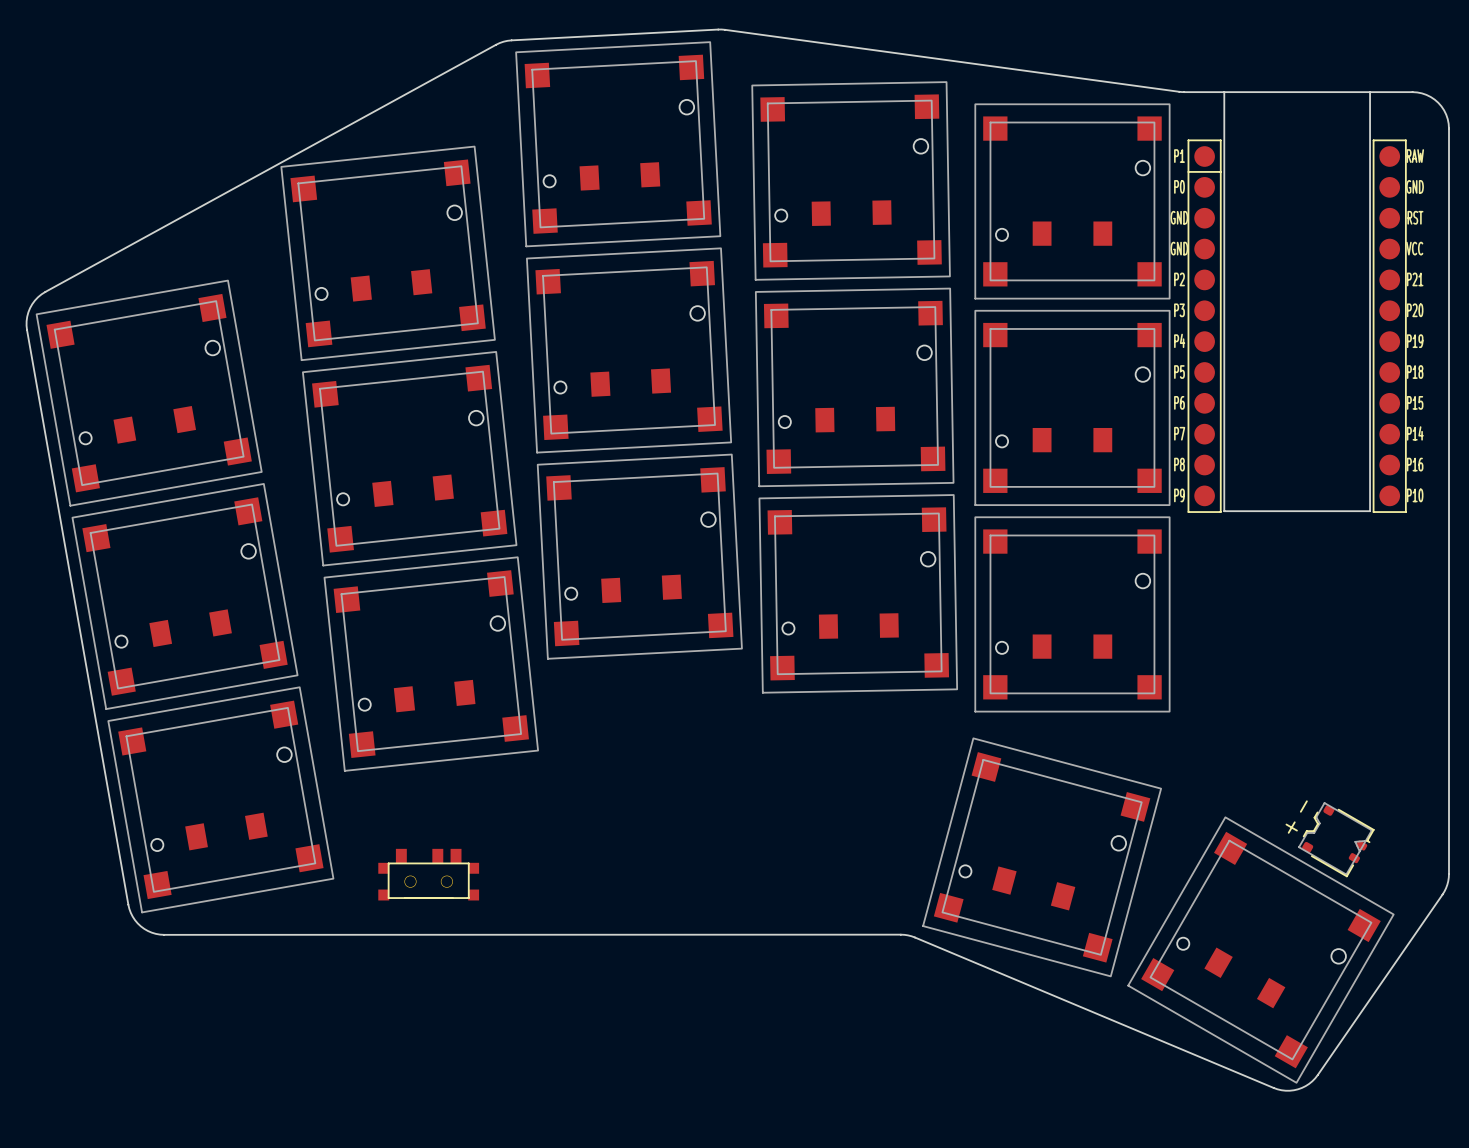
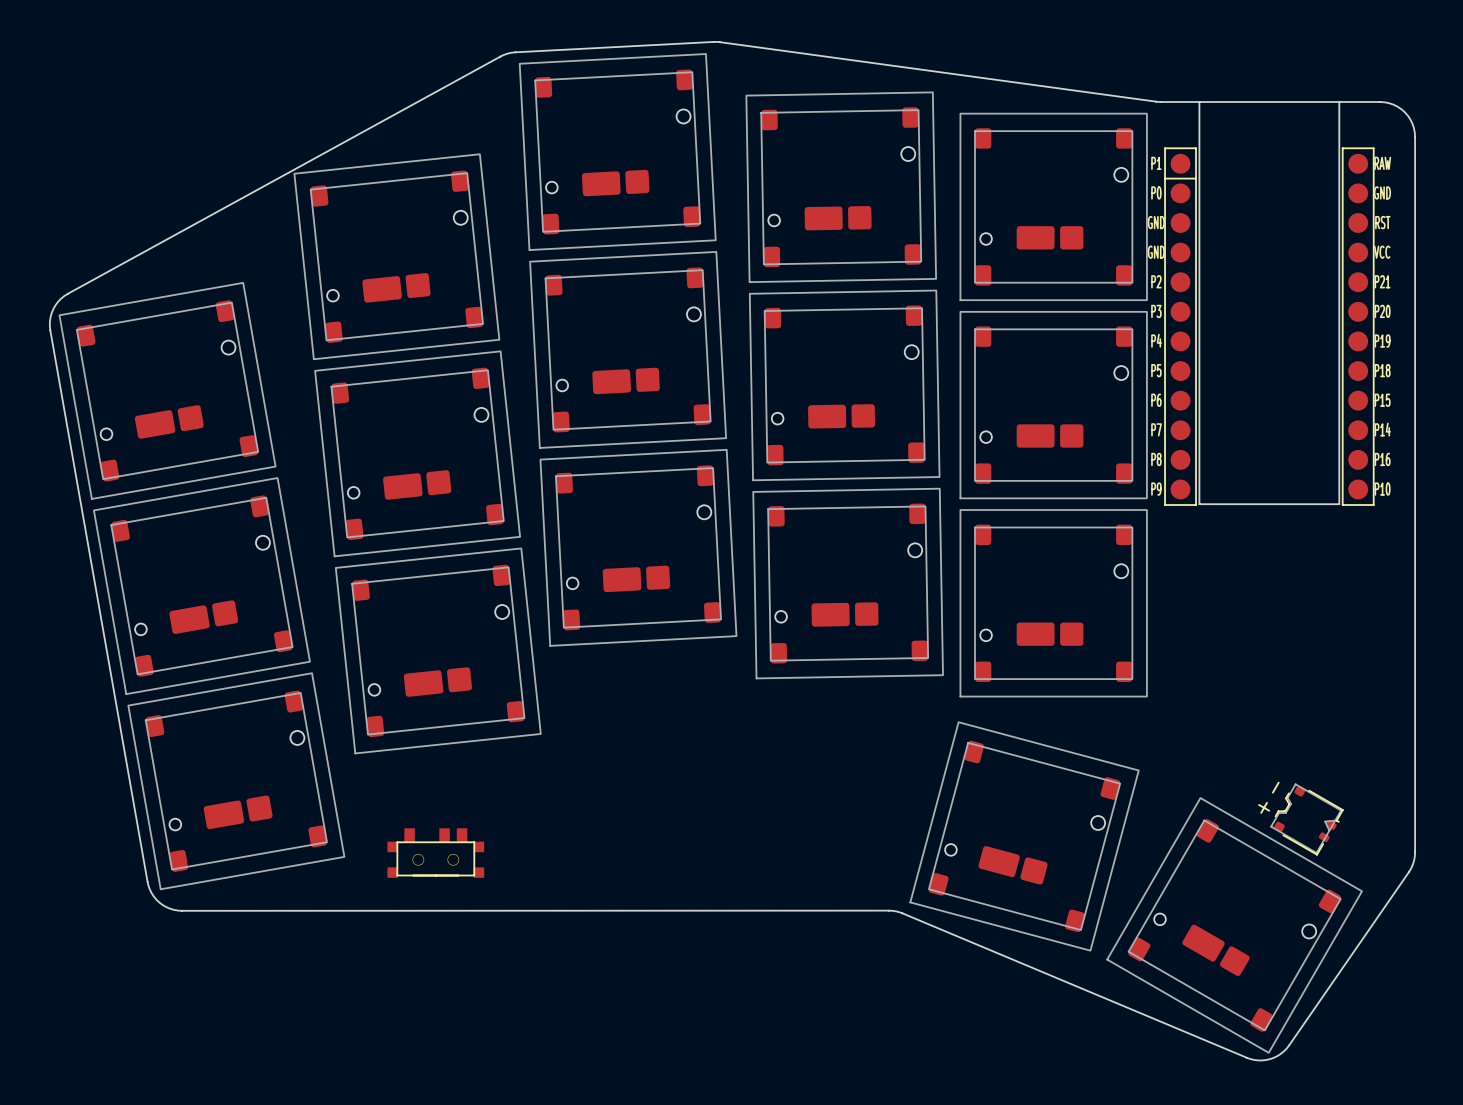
part footprint: [515, 41, 721, 247] -> [519, 53, 717, 251]
part footprint: [751, 81, 951, 281] -> [745, 91, 937, 283]
part footprint: [974, 103, 1171, 300] -> [959, 113, 1148, 301]
part footprint: [280, 145, 496, 361] -> [293, 153, 500, 360]
part footprint: [526, 247, 732, 454] -> [529, 251, 727, 449]
part footprint: [35, 279, 263, 507] -> [58, 282, 277, 500]
part footprint: [755, 287, 955, 487] -> [749, 289, 941, 481]
part footprint: [974, 310, 1171, 506] -> [959, 311, 1148, 499]
part footprint: [302, 351, 518, 567] -> [314, 350, 521, 557]
part footprint: [537, 453, 743, 660] -> [539, 449, 738, 647]
part footprint: [71, 483, 299, 710] -> [93, 477, 311, 695]
part footprint: [758, 494, 958, 694] -> [752, 488, 944, 680]
part footprint: [974, 516, 1171, 713] -> [959, 509, 1148, 698]
part footprint: [323, 556, 539, 772] -> [335, 547, 542, 755]
part footprint: [107, 686, 335, 914] -> [127, 672, 345, 890]
part footprint: [922, 737, 1162, 977] -> [909, 721, 1140, 952]
part footprint: [1127, 816, 1395, 1084] -> [1106, 797, 1363, 1054]

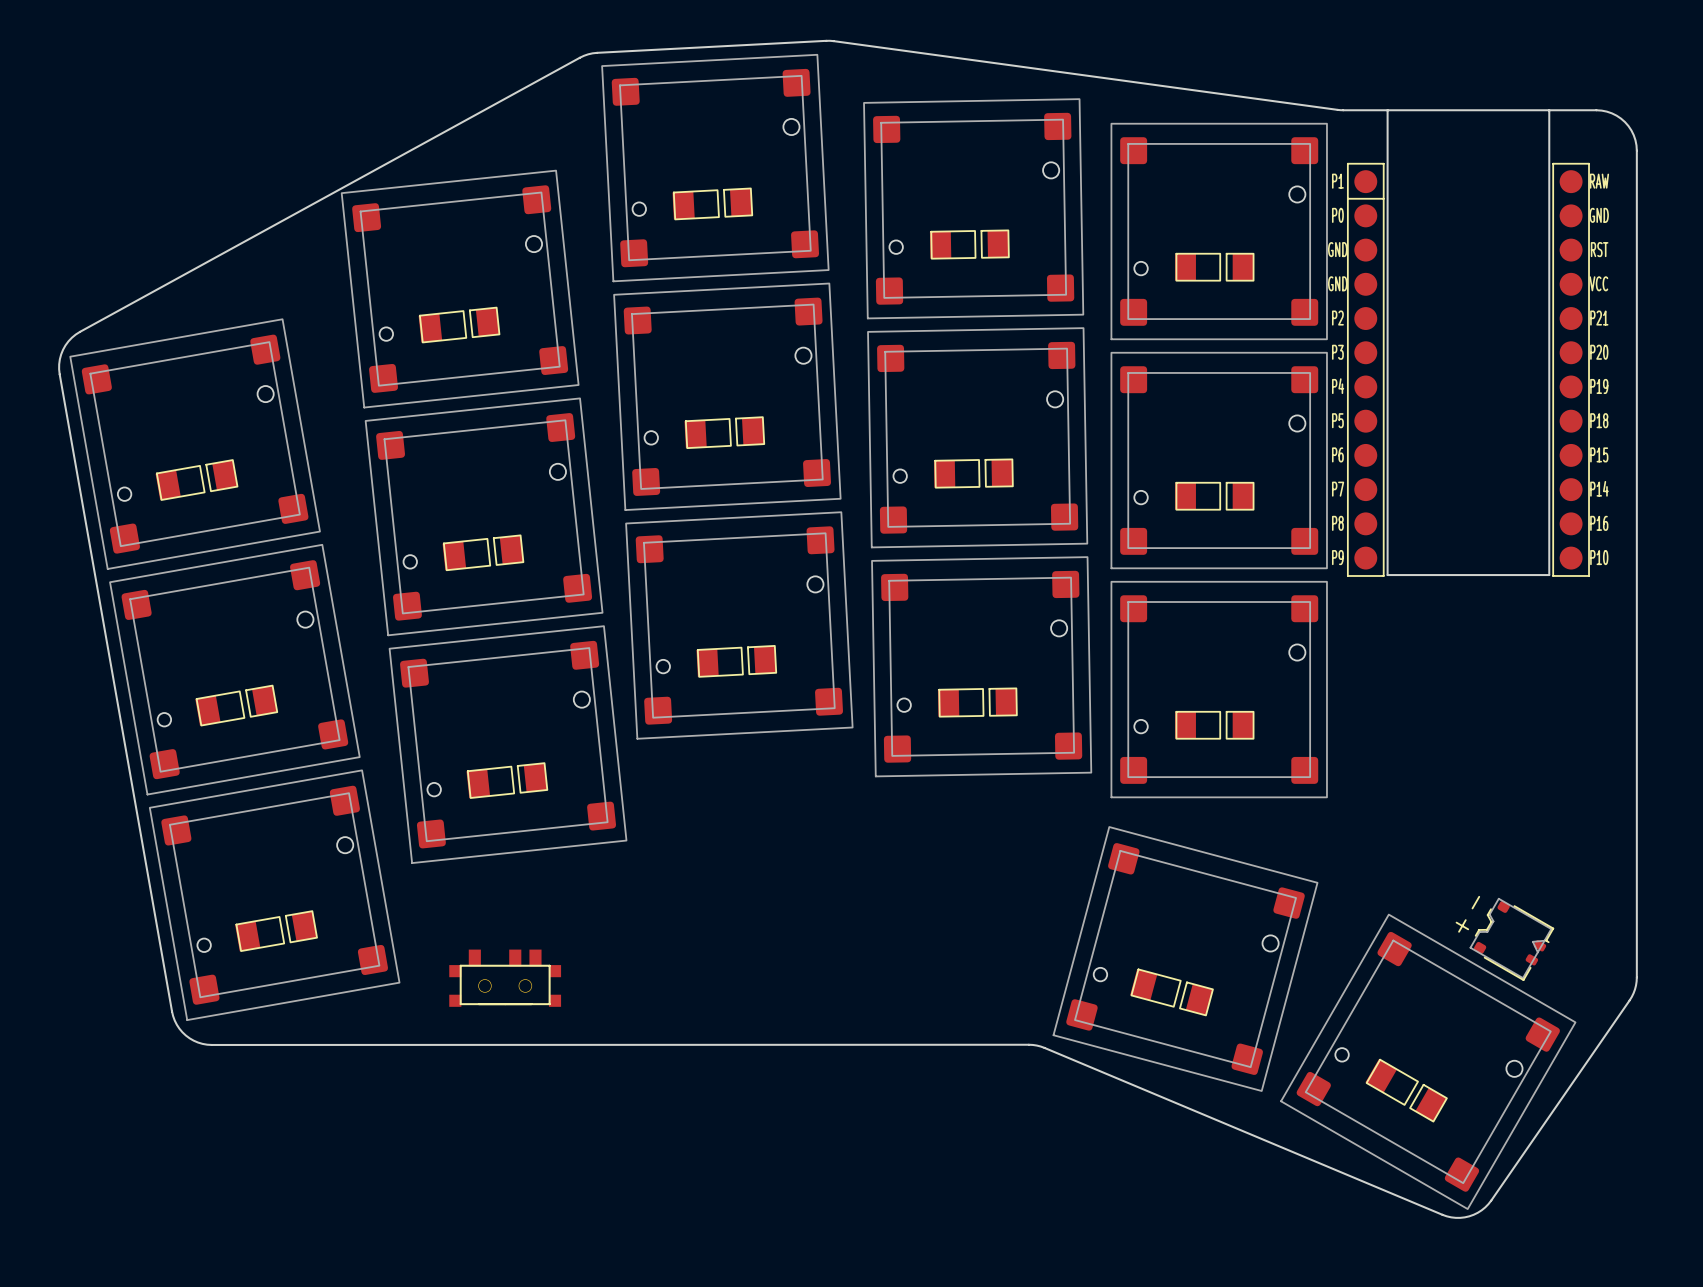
part footprint: [519, 53, 717, 251] -> [601, 54, 830, 283]
part footprint: [745, 91, 937, 283] -> [863, 98, 1084, 320]
part footprint: [959, 113, 1148, 301] -> [1110, 123, 1328, 340]
part footprint: [293, 153, 500, 360] -> [341, 169, 580, 409]
part footprint: [529, 251, 727, 449] -> [613, 282, 842, 511]
part footprint: [58, 282, 277, 500] -> [69, 318, 321, 570]
part footprint: [749, 289, 941, 481] -> [867, 327, 1088, 549]
part footprint: [959, 311, 1148, 499] -> [1110, 352, 1328, 569]
part footprint: [314, 350, 521, 557] -> [364, 397, 604, 636]
part footprint: [539, 449, 738, 647] -> [625, 511, 854, 740]
part footprint: [93, 477, 311, 695] -> [109, 544, 361, 796]
part footprint: [752, 488, 944, 680] -> [871, 556, 1092, 778]
part footprint: [959, 509, 1148, 698] -> [1110, 581, 1328, 799]
part footprint: [335, 547, 542, 755] -> [388, 625, 628, 864]
part footprint: [127, 672, 345, 890] -> [149, 769, 401, 1021]
part footprint: [909, 721, 1140, 952] -> [1052, 826, 1319, 1092]
part footprint: [1106, 797, 1363, 1054] -> [1280, 913, 1577, 1210]

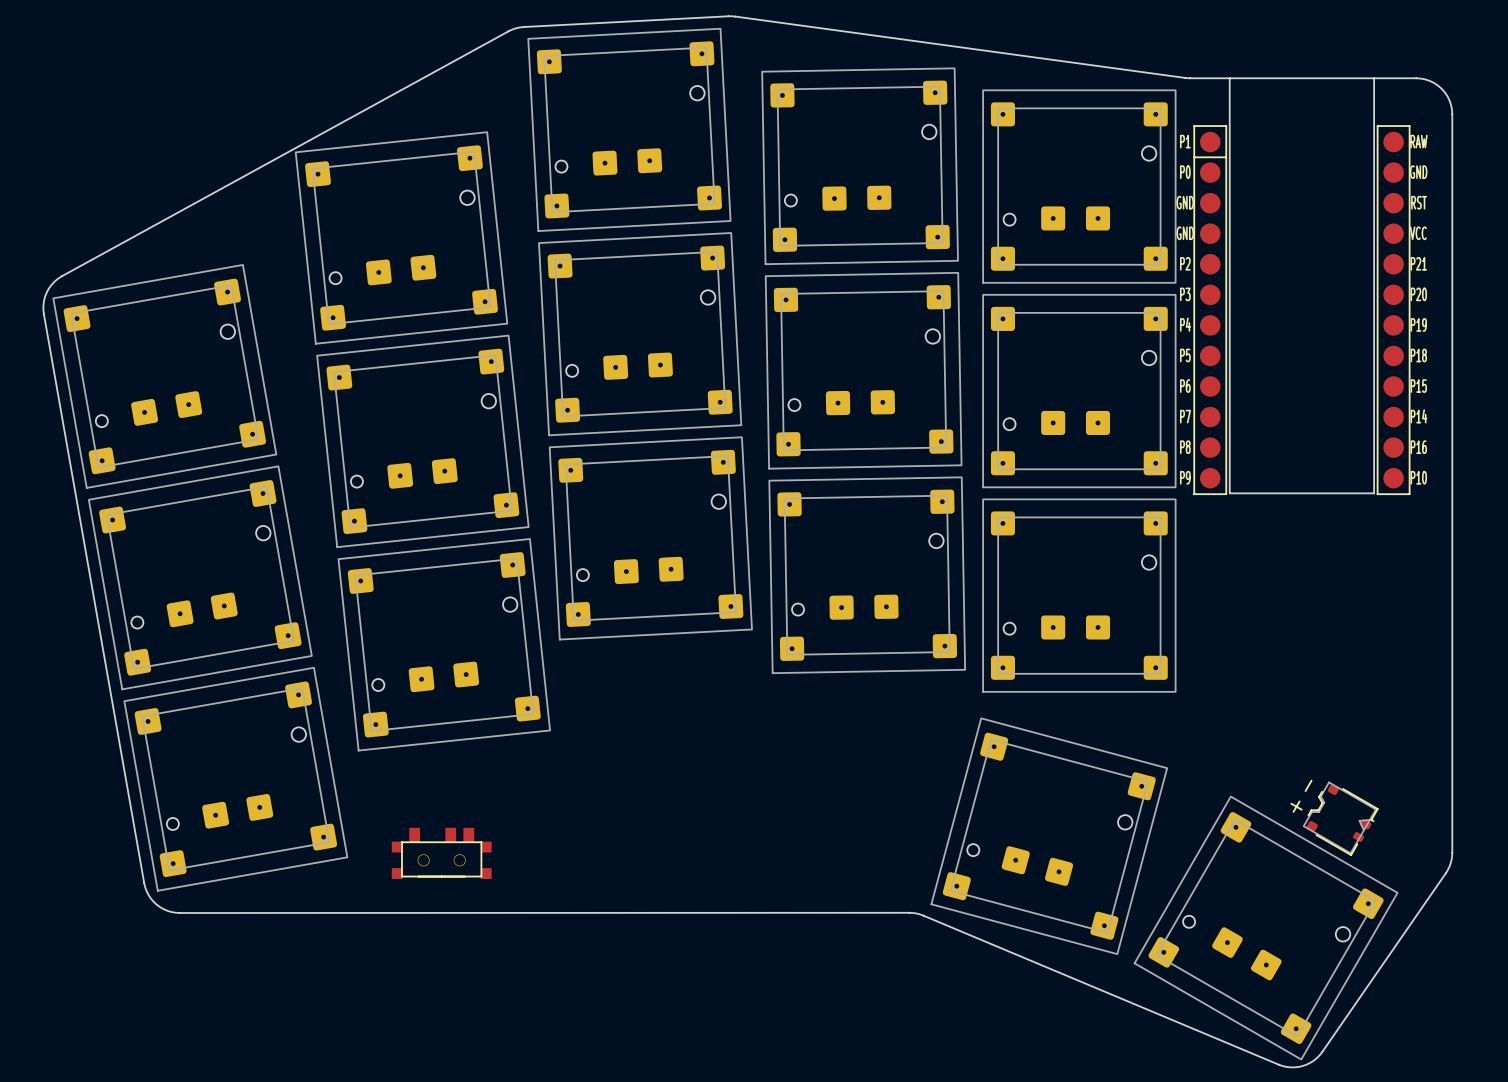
part footprint: [601, 54, 830, 283] -> [527, 28, 732, 232]
part footprint: [863, 98, 1084, 320] -> [761, 67, 959, 265]
part footprint: [1110, 123, 1328, 340] -> [982, 89, 1177, 284]
part footprint: [341, 169, 580, 409] -> [295, 131, 508, 345]
part footprint: [613, 282, 842, 511] -> [538, 232, 742, 436]
part footprint: [69, 318, 321, 570] -> [52, 264, 277, 489]
part footprint: [867, 327, 1088, 549] -> [765, 272, 963, 470]
part footprint: [1110, 352, 1328, 569] -> [982, 294, 1177, 488]
part footprint: [364, 397, 604, 636] -> [316, 335, 530, 548]
part footprint: [625, 511, 854, 740] -> [549, 436, 753, 641]
part footprint: [109, 544, 361, 796] -> [88, 465, 313, 690]
part footprint: [871, 556, 1092, 778] -> [768, 476, 966, 674]
part footprint: [1110, 581, 1328, 799] -> [982, 498, 1177, 693]
part footprint: [388, 625, 628, 864] -> [337, 538, 551, 752]
part footprint: [149, 769, 401, 1021] -> [123, 667, 348, 892]
part footprint: [1052, 826, 1319, 1092] -> [930, 717, 1168, 955]
part footprint: [1280, 913, 1577, 1210] -> [1133, 795, 1399, 1061]

